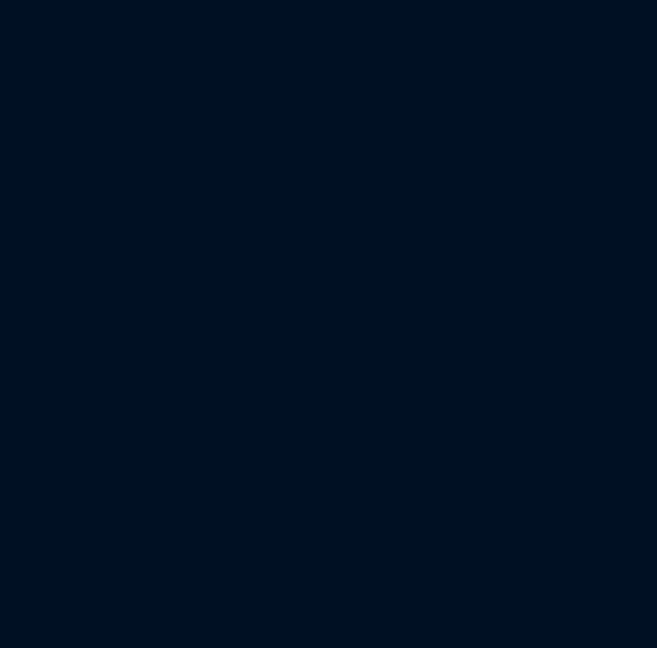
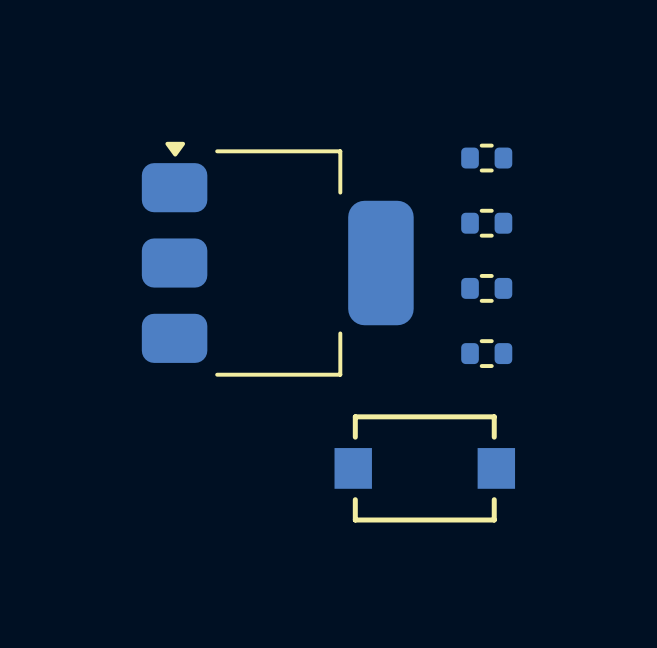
part: none -> (486, 158)
part: none -> (486, 223)
part: none -> (277, 259)
part: none -> (486, 288)
part: none -> (486, 353)
part: none -> (424, 468)

